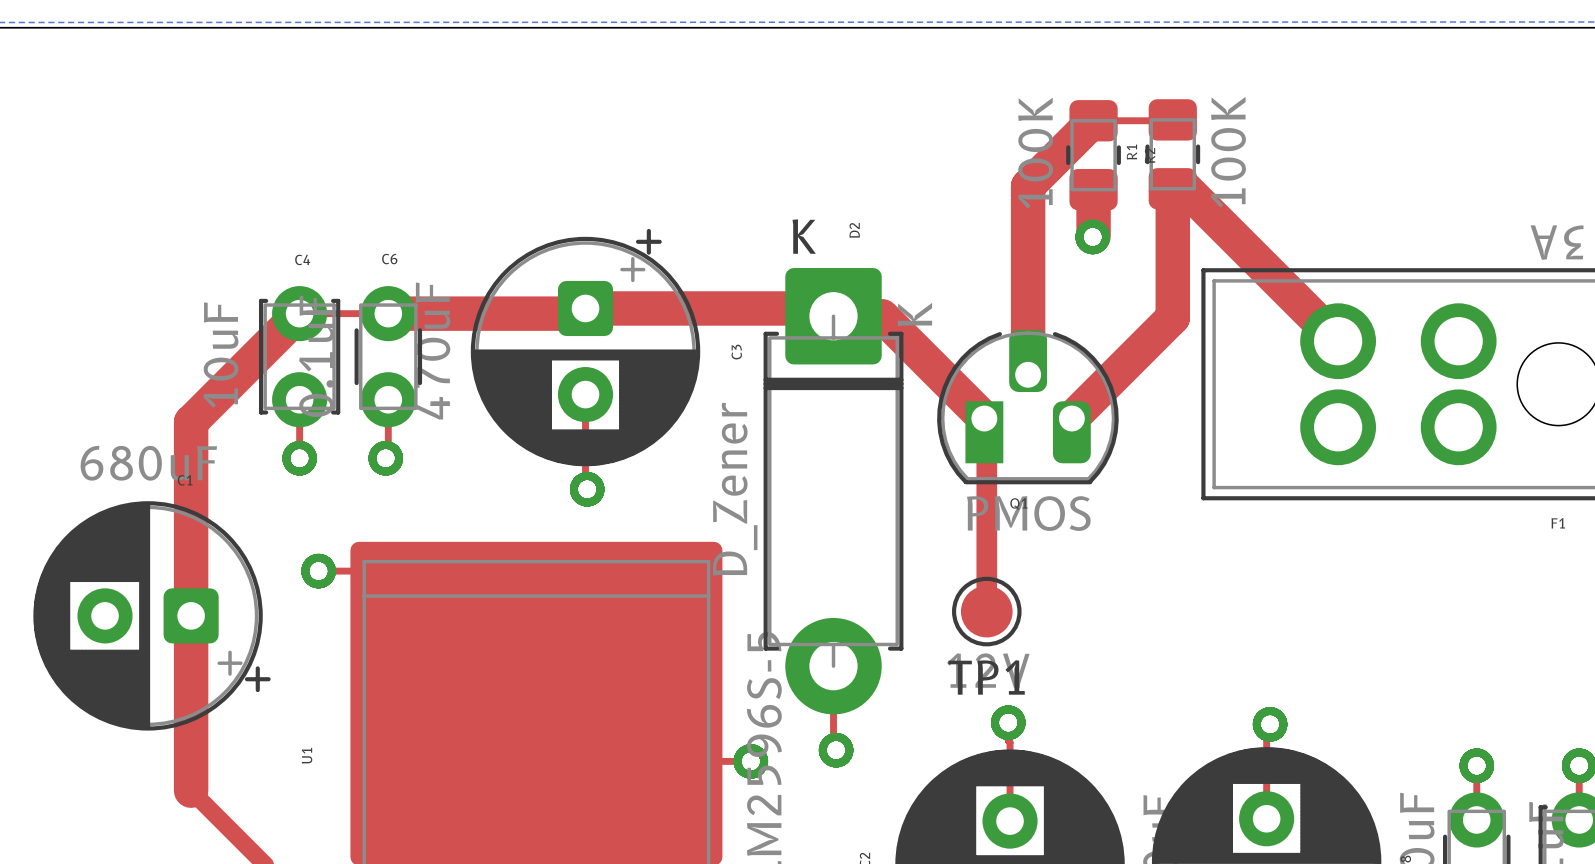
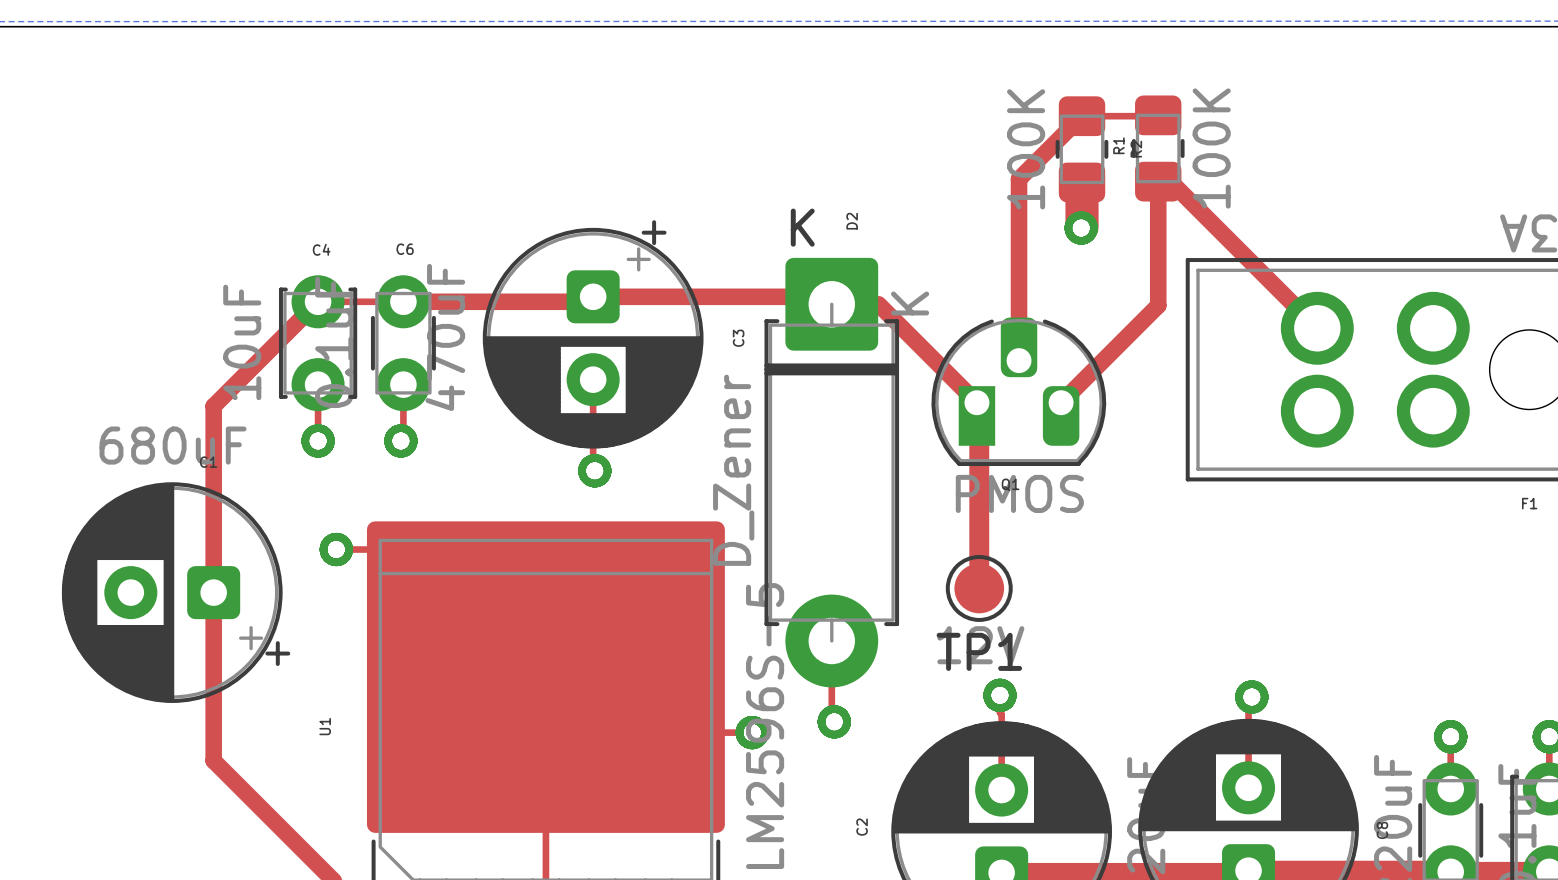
top track width: thick (1093, 120) (1028, 186) (1028, 374) -> thin (1082, 116) (1019, 179) (1019, 360)
top track width: thick (1172, 188) (1172, 317) (1071, 418) -> thin (1158, 181) (1158, 305) (1061, 402)
top track width: thick (1185, 188) (1338, 341) -> thin (1170, 181) (1317, 328)
top track width: thick (585, 308) (825, 308) -> thin (593, 296) (824, 296)
top track width: thick (299, 313) (191, 422) (191, 790) -> thin (318, 301) (213, 406) (213, 760)
top track width: thick (388, 313) (580, 313) -> thin (403, 301) (588, 301)
top track width: thick (882, 316) (984, 418) -> thin (878, 304) (976, 402)

